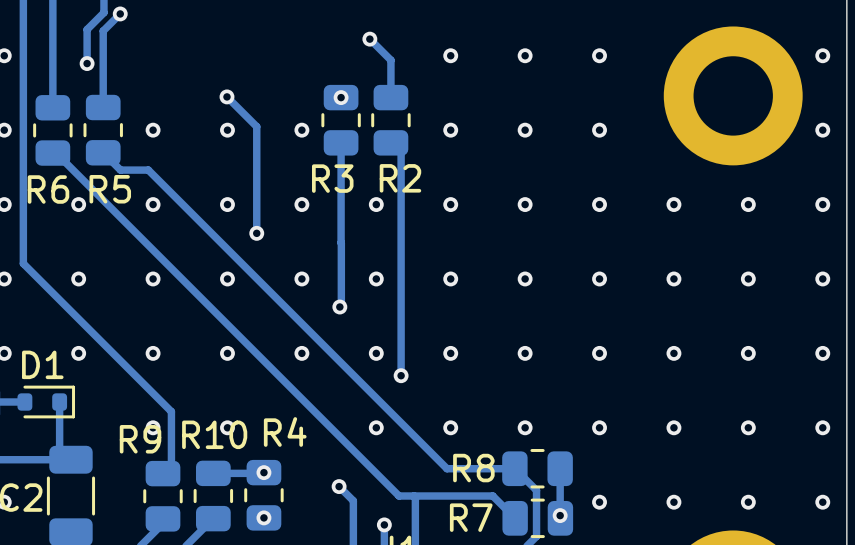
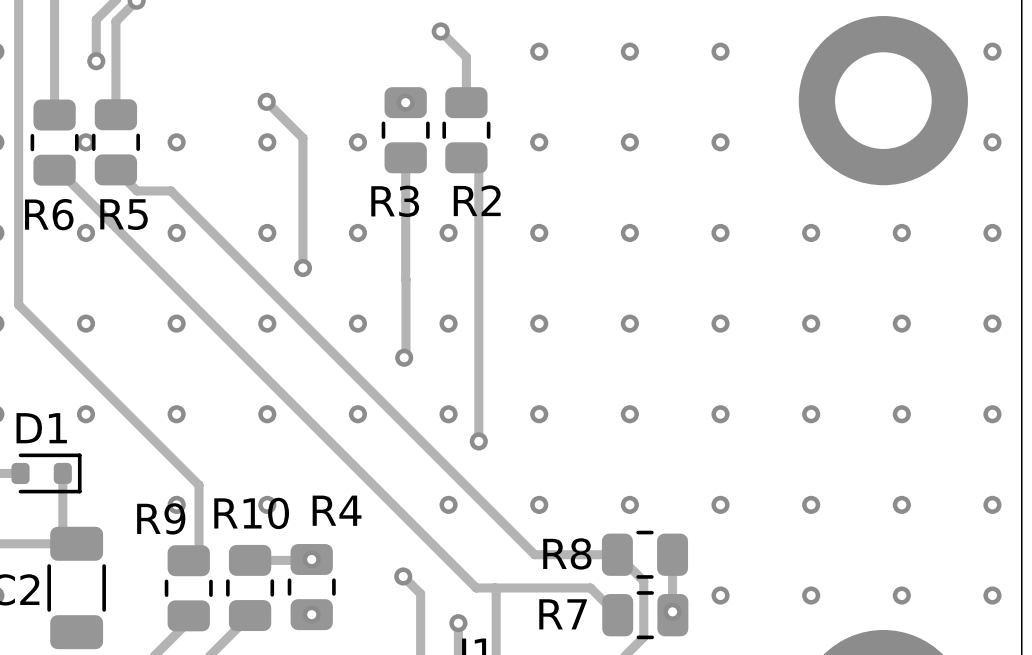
via: none -> (86, 142)

